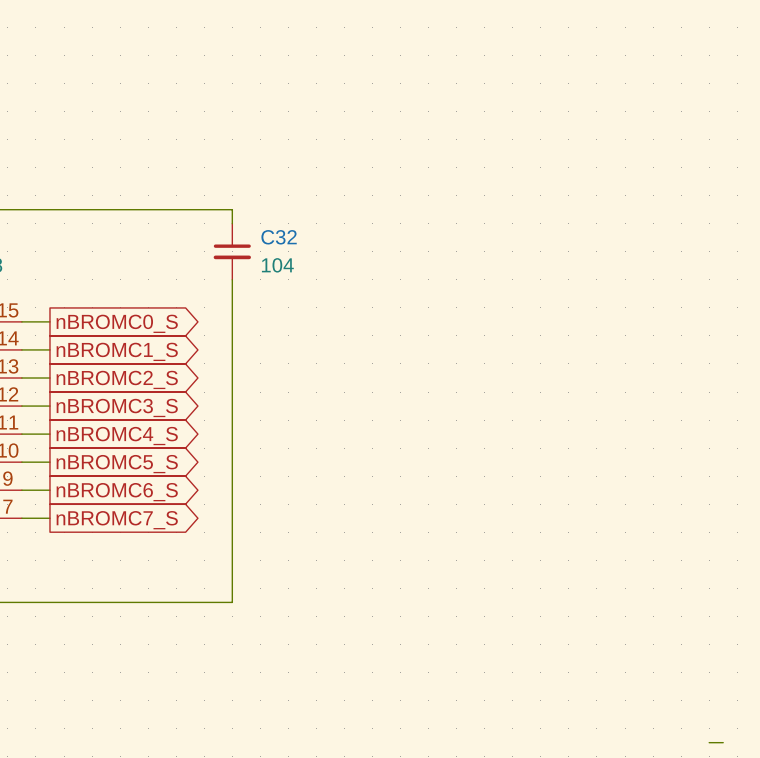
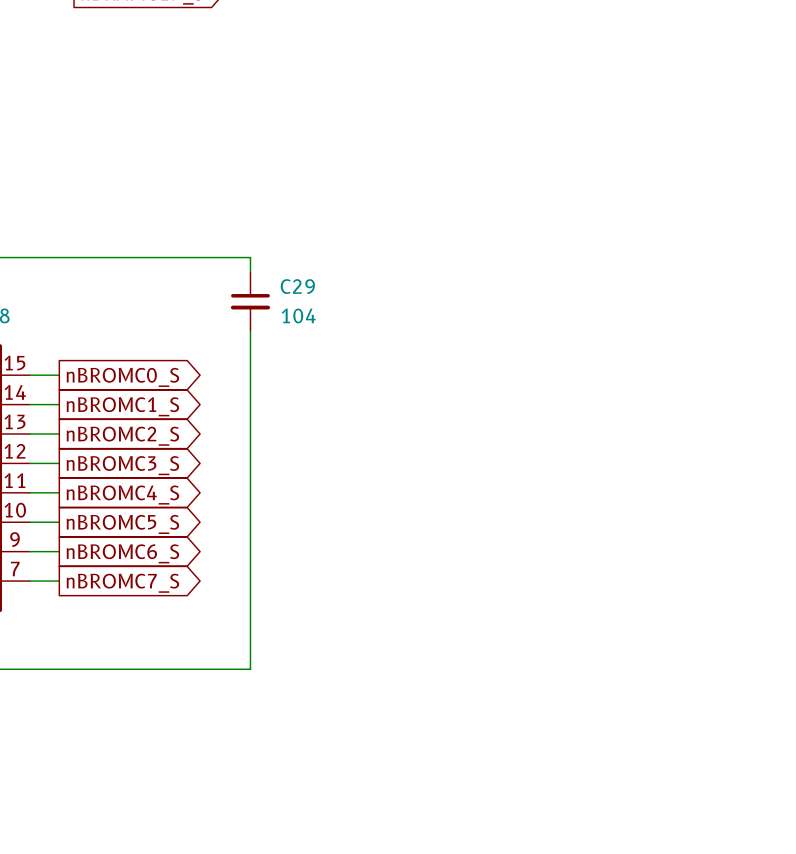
C32 name: C32 (279, 237) -> C29 (297, 286)
wire: (709, 742) (723, 742) -> none

